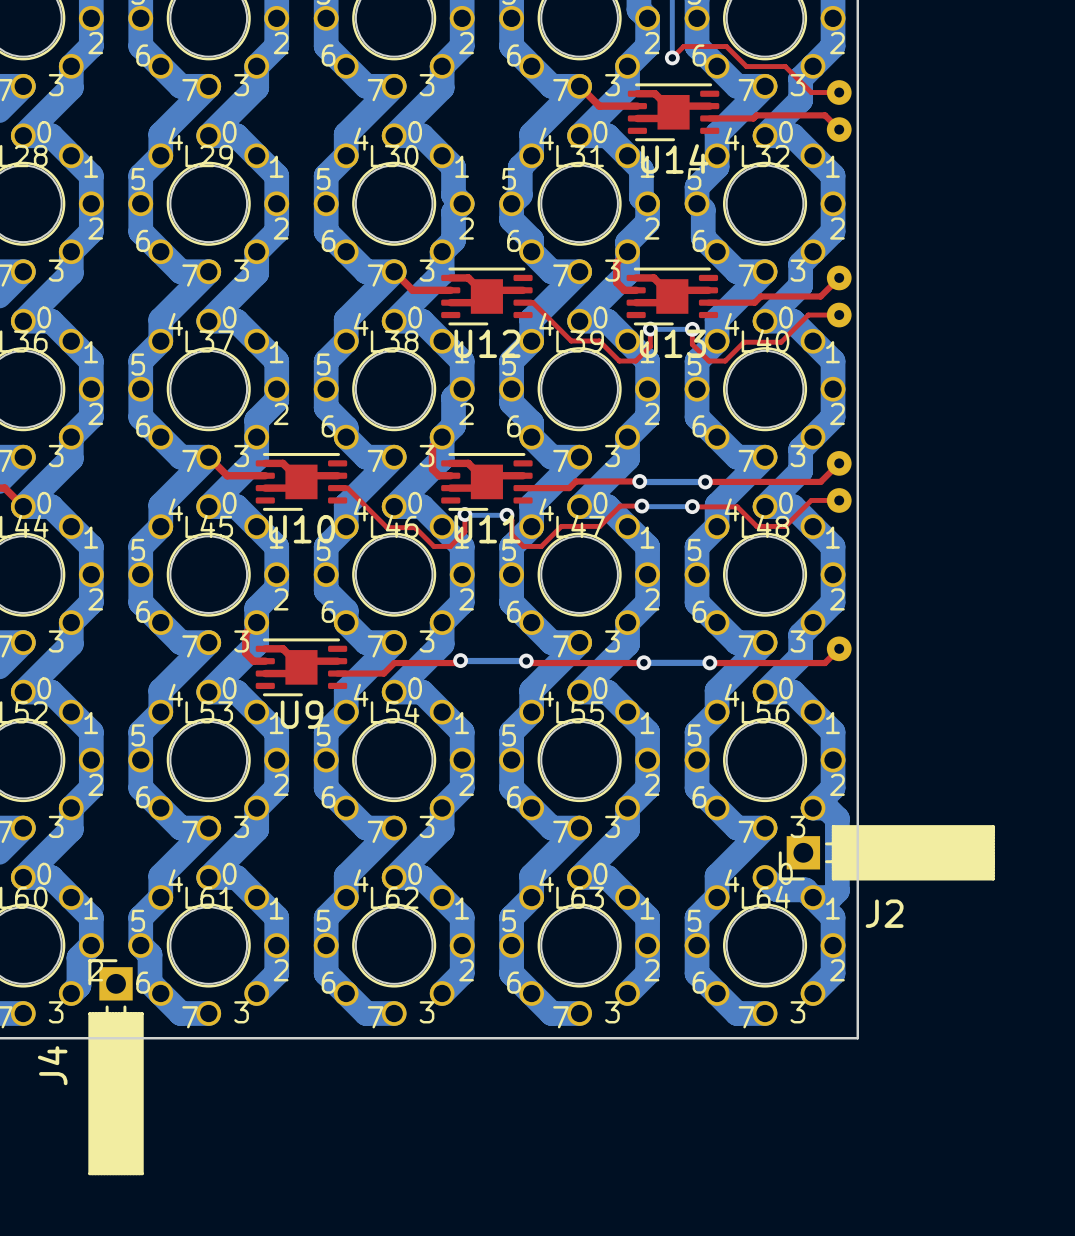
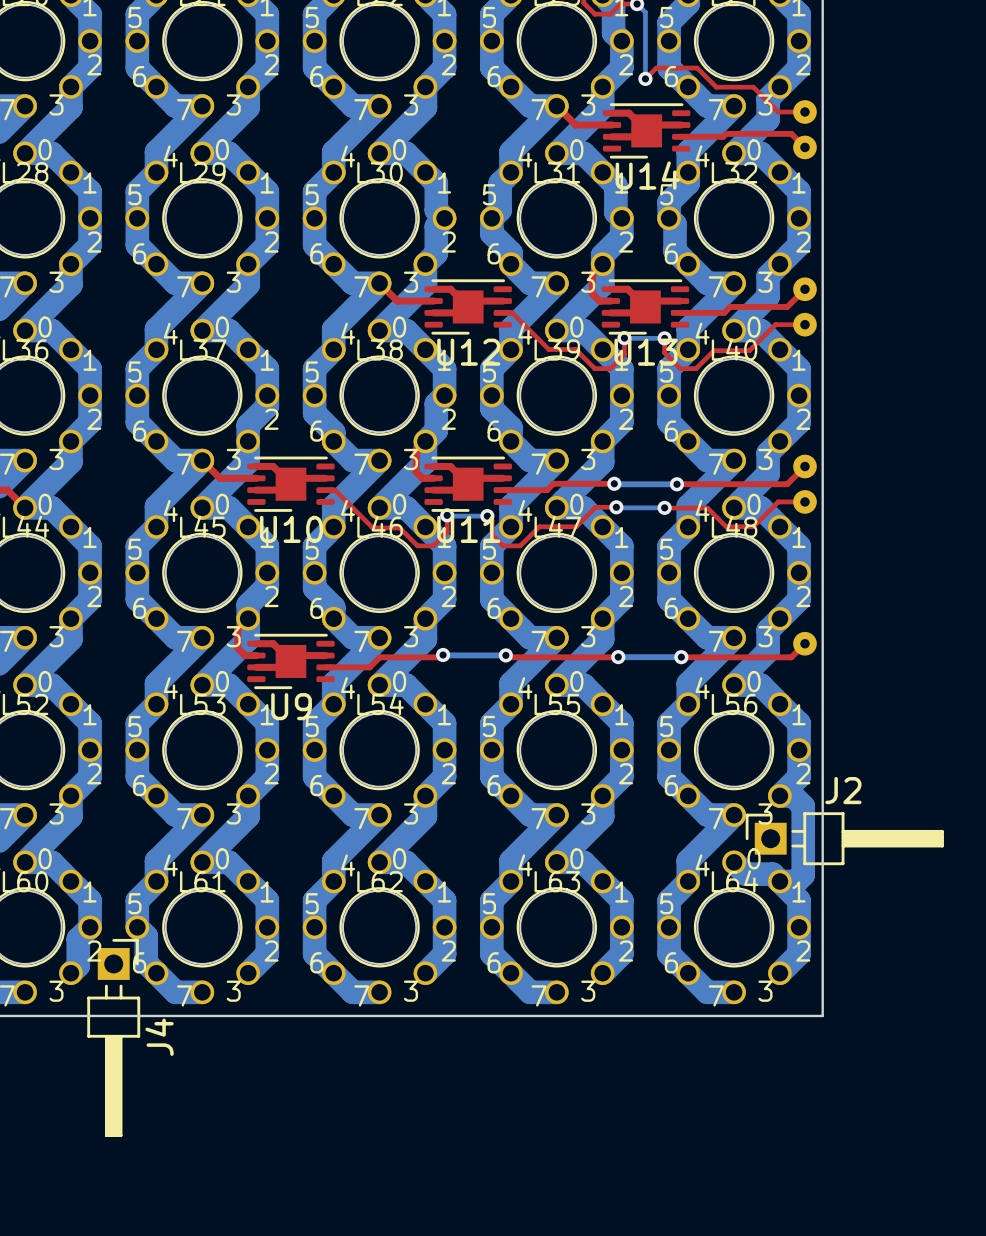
J2 footprint: [778, 825, 995, 881] -> [745, 812, 944, 866]
J2 name position: J2 (884, 913) -> J2 (843, 790)
J4 footprint: [88, 959, 144, 1176] -> [87, 938, 141, 1137]
J4 name position: J4 (52, 1065) -> J4 (159, 1037)

